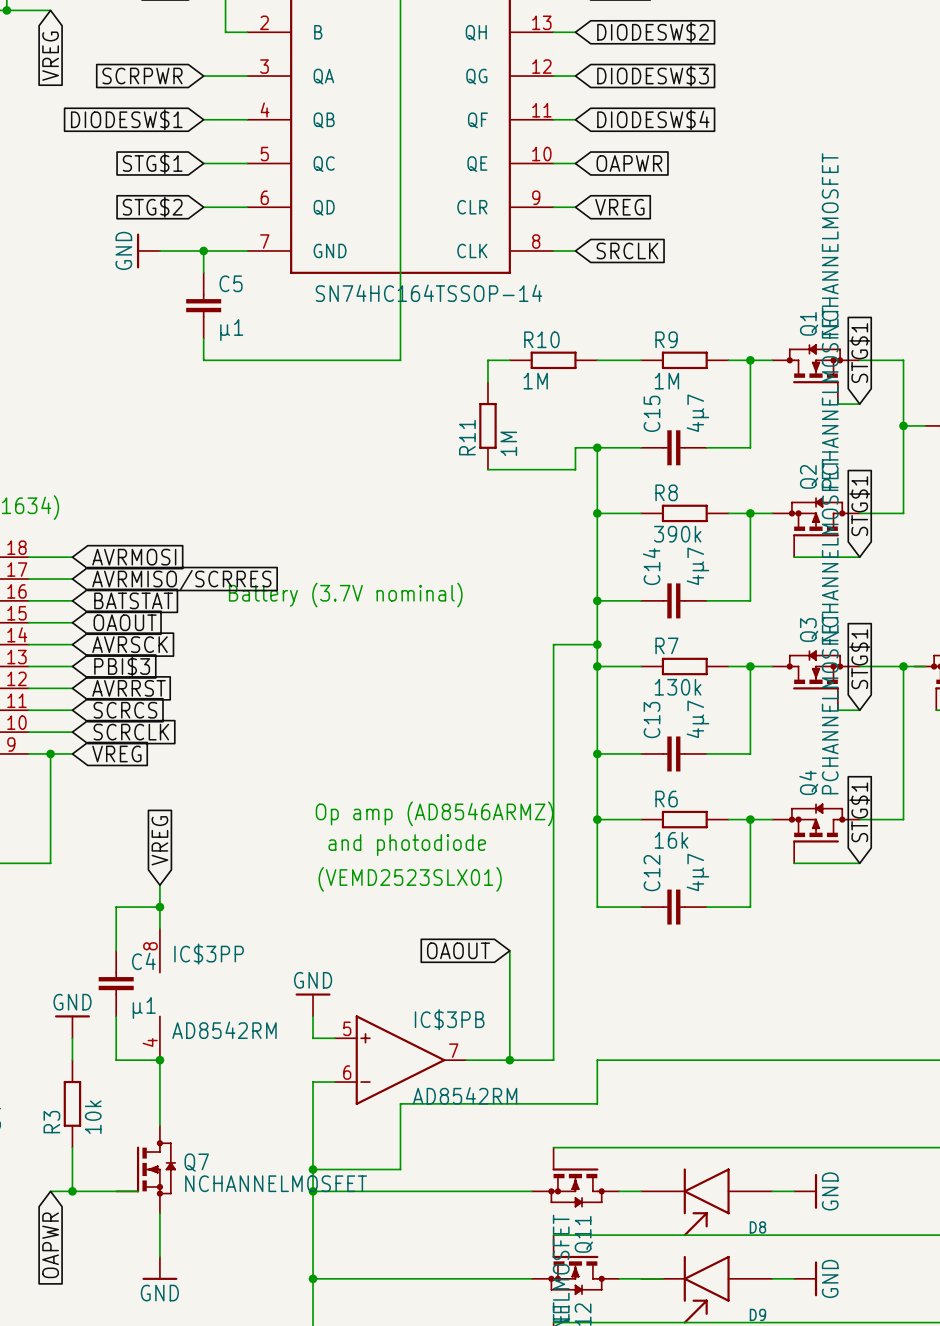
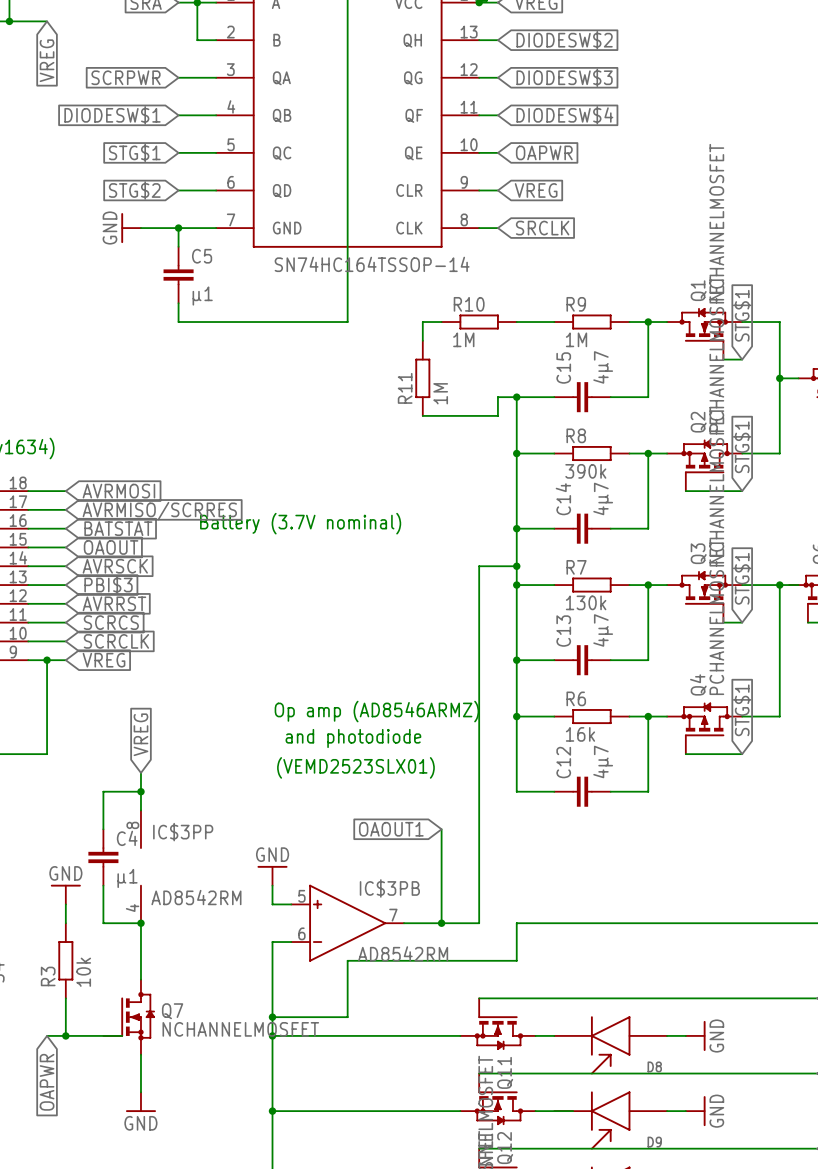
global label: OAOUT (458, 950) -> OAOUT1 (391, 829)

